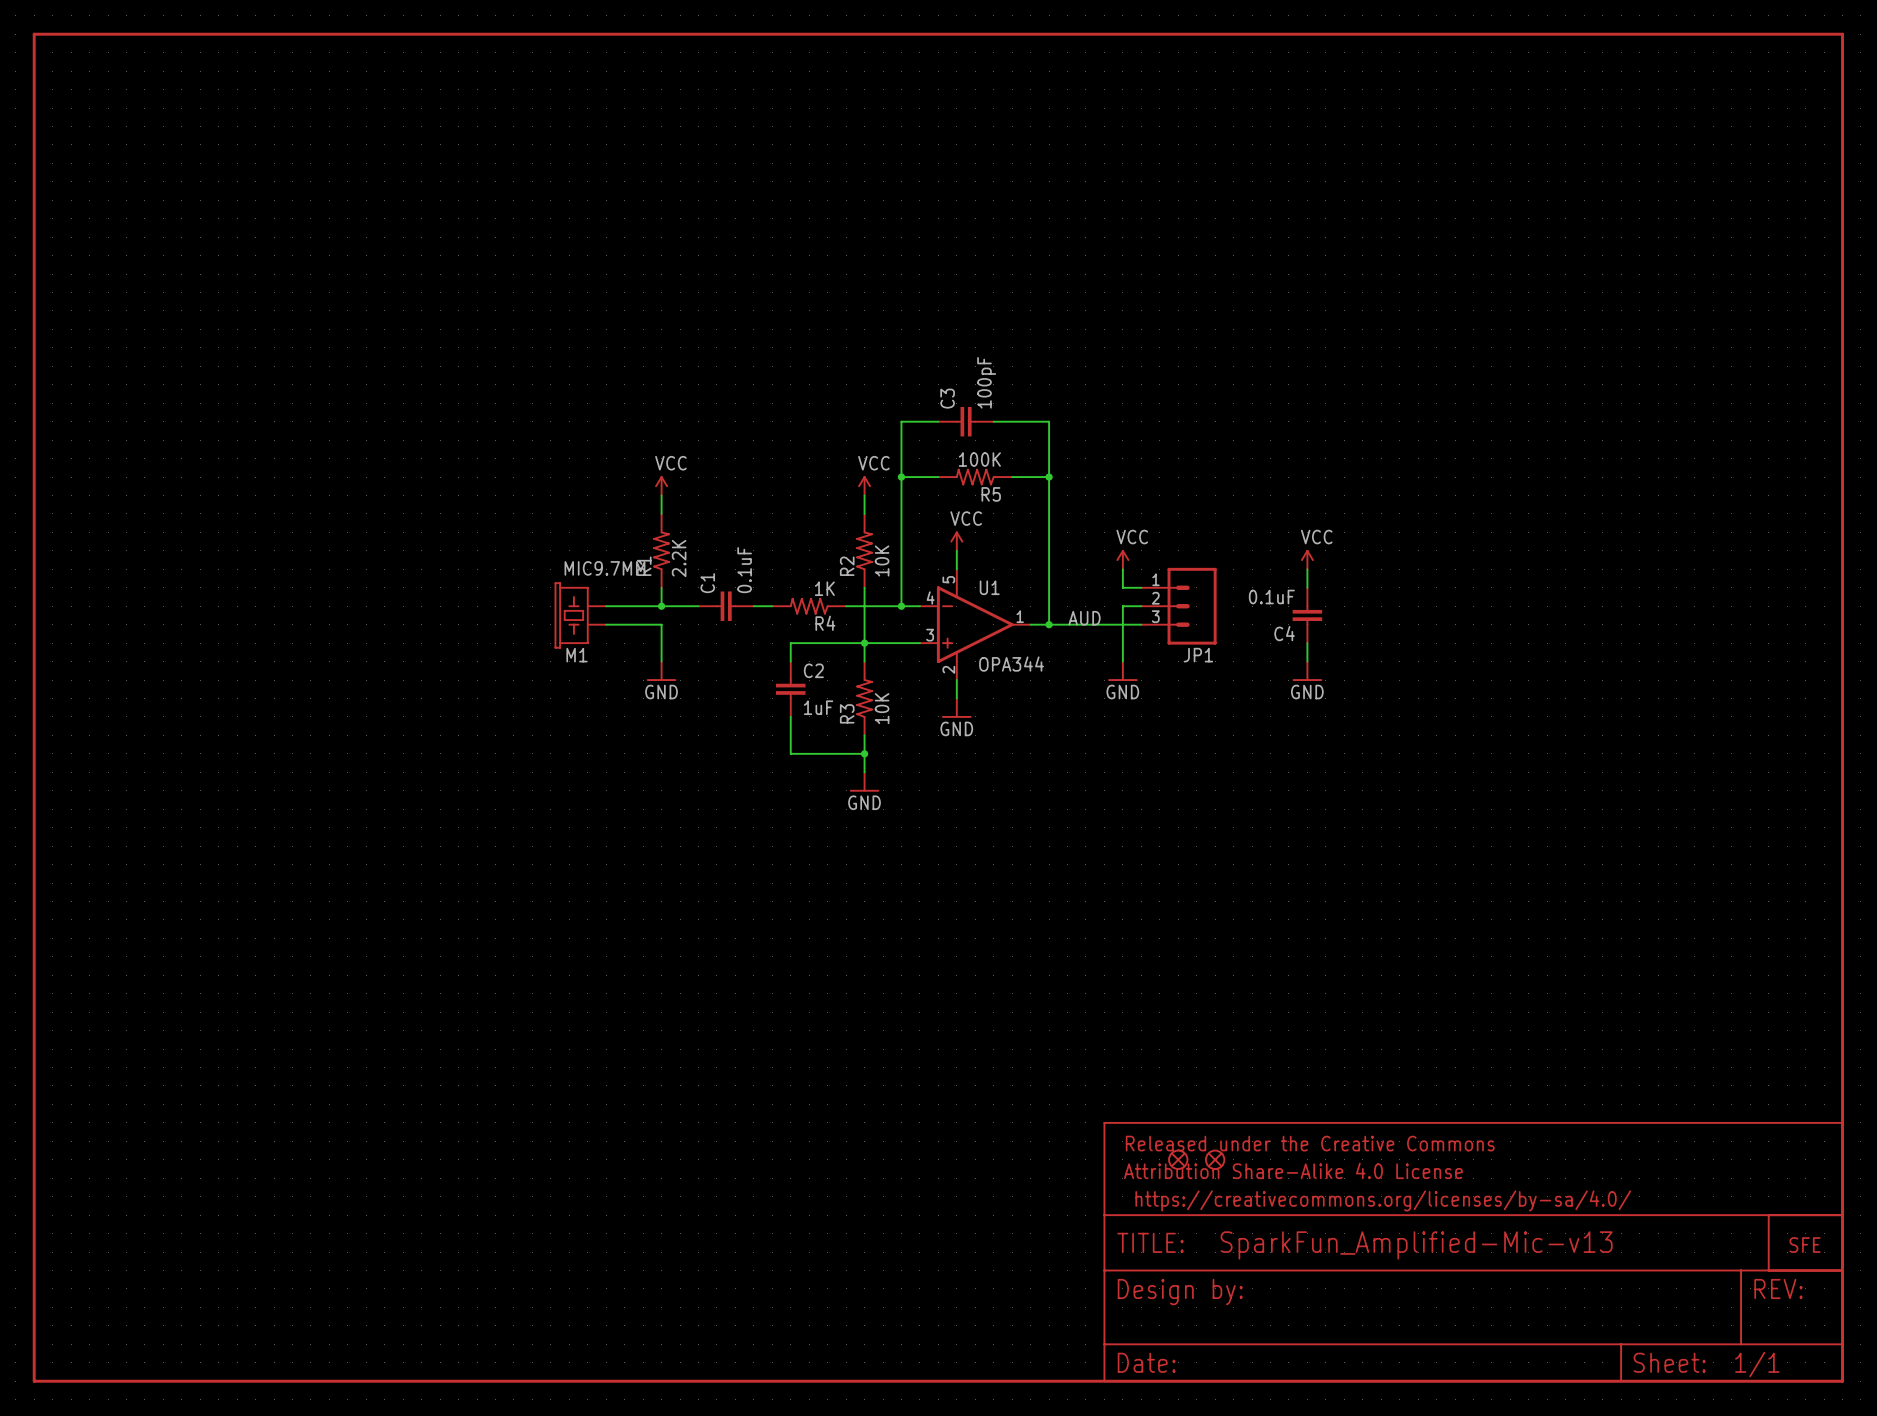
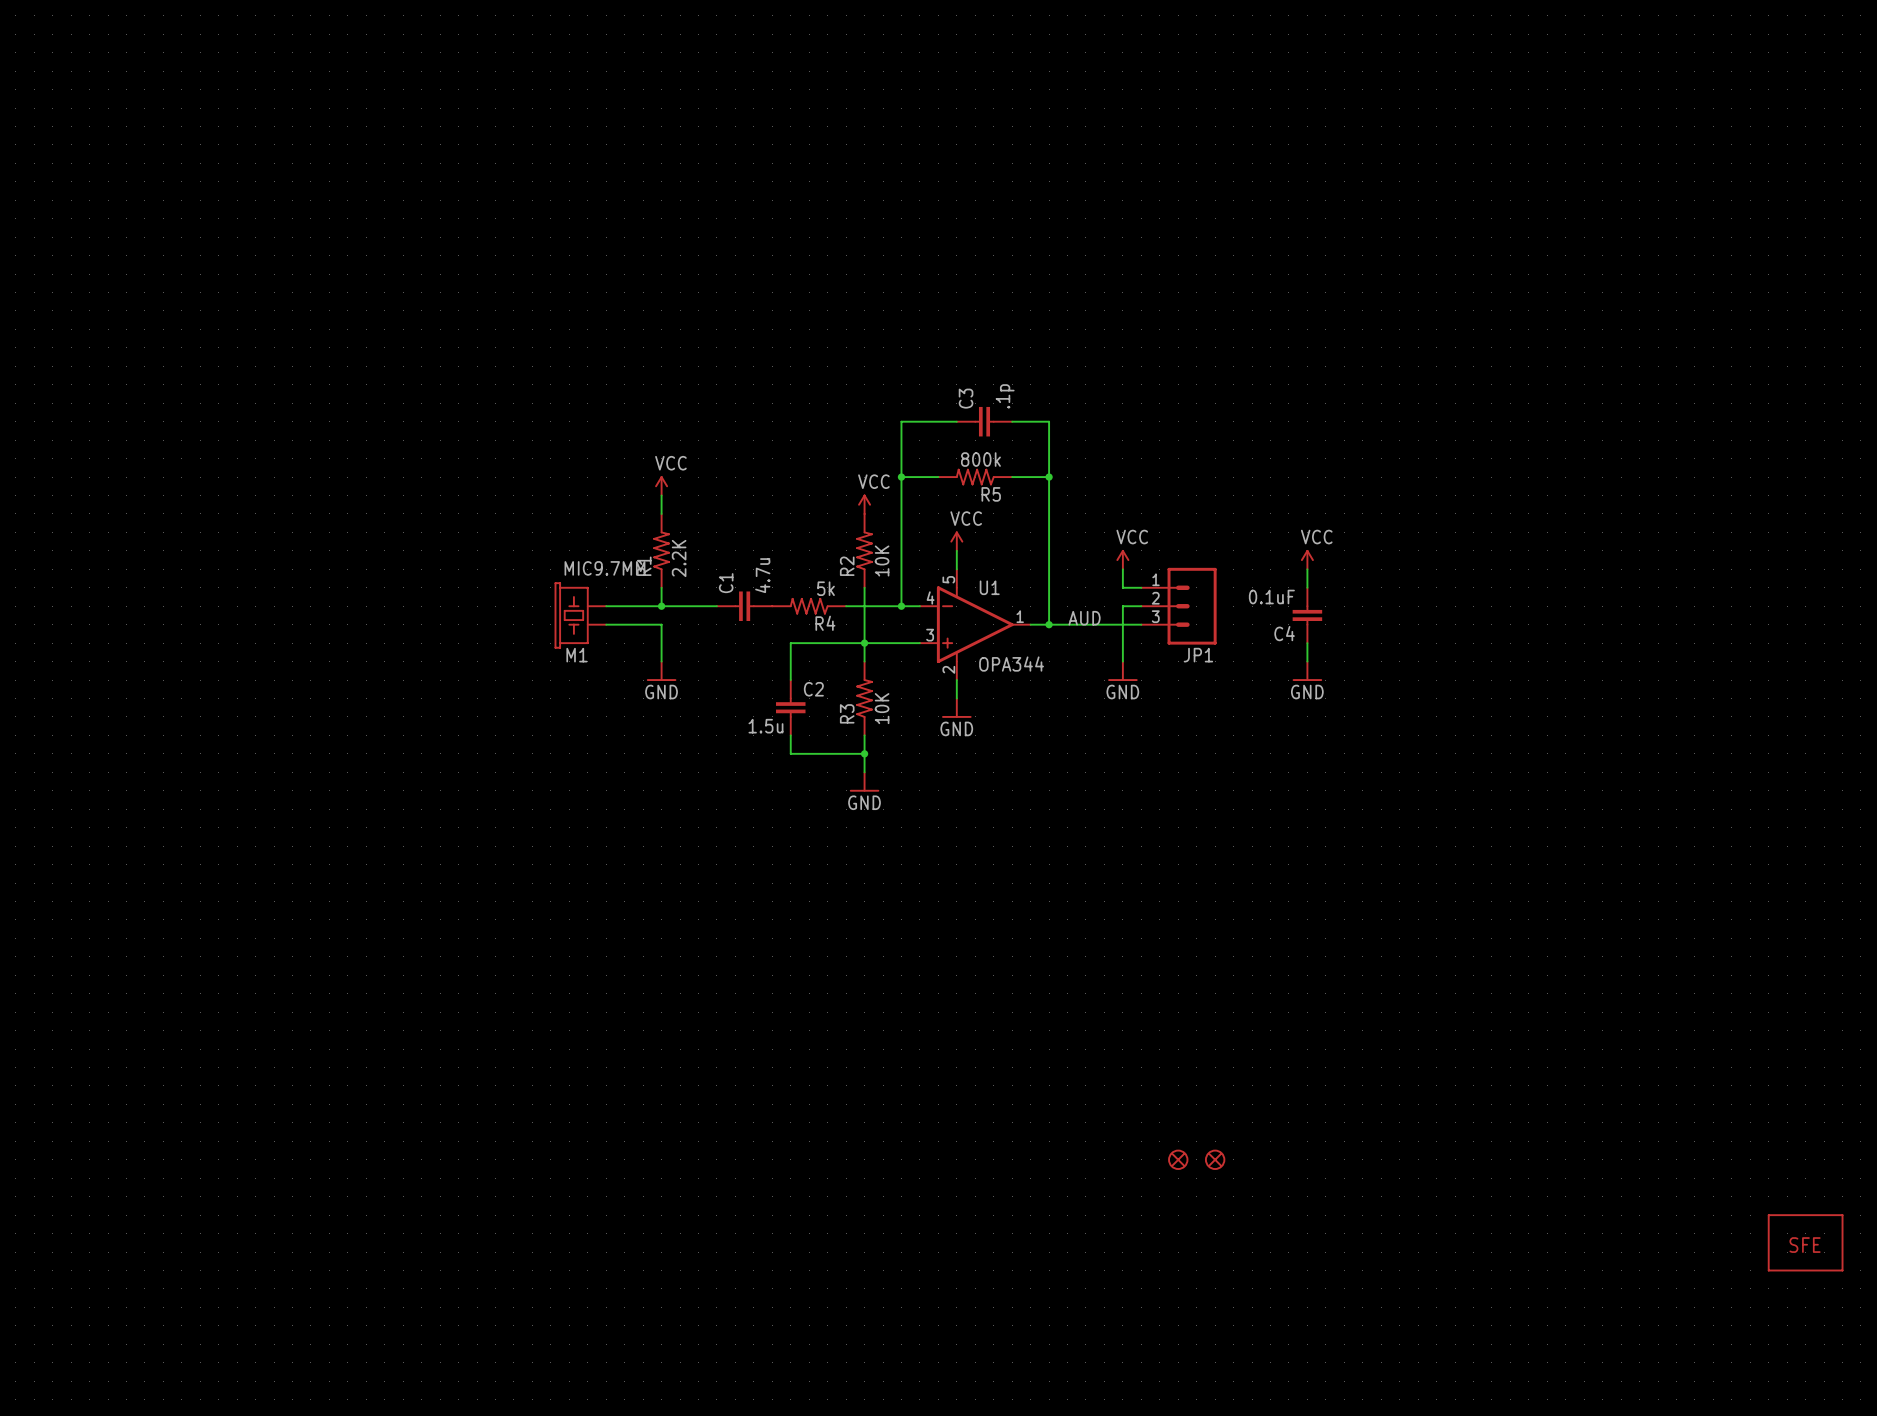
C3 value: 100pF (986, 382) -> .1p (1005, 396)
C3 position: (966, 421) -> (984, 421)
R5 value: 100K (979, 459) -> 800k (980, 459)
power symbol position: VCC (864, 485) -> VCC (864, 504)
C1 value: 0.1uF (744, 570) -> 4.7u (762, 575)
R4 value: 1K (824, 588) -> 5k (825, 588)
C1 position: (726, 606) -> (744, 606)
C2 position: (790, 689) -> (790, 707)
C2 value: 1uF (818, 707) -> 1.5u (765, 726)
part: (938, 707) -> none
part: (1473, 1252) -> none

